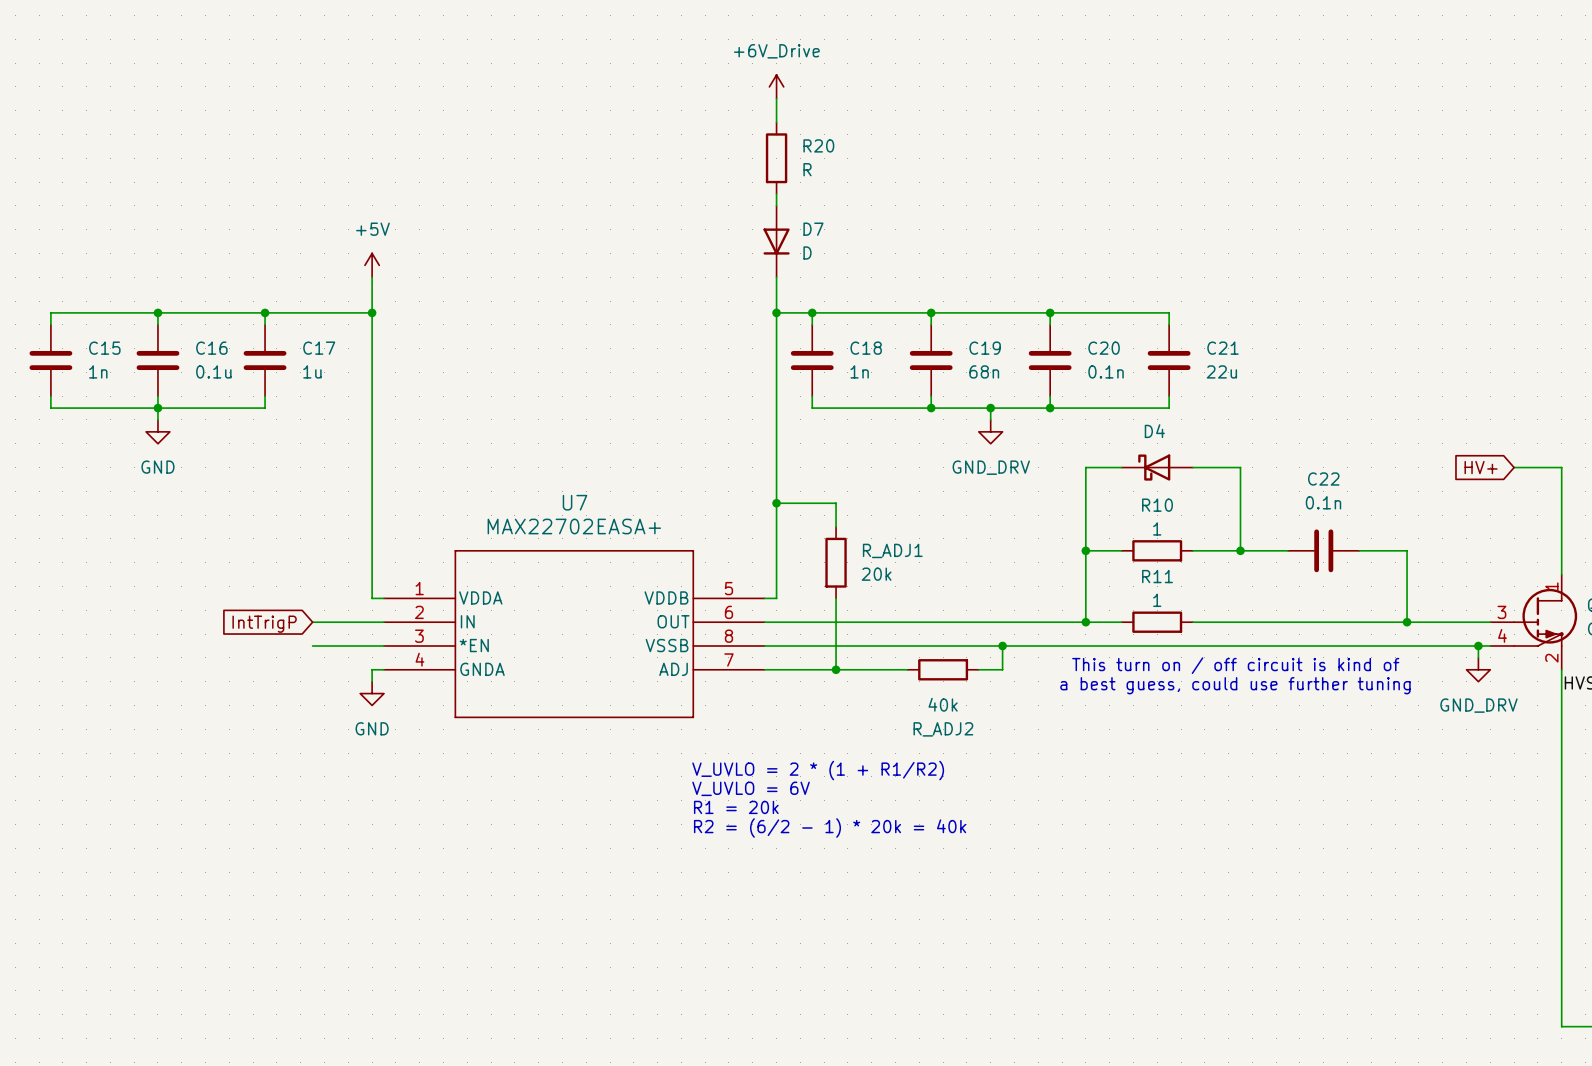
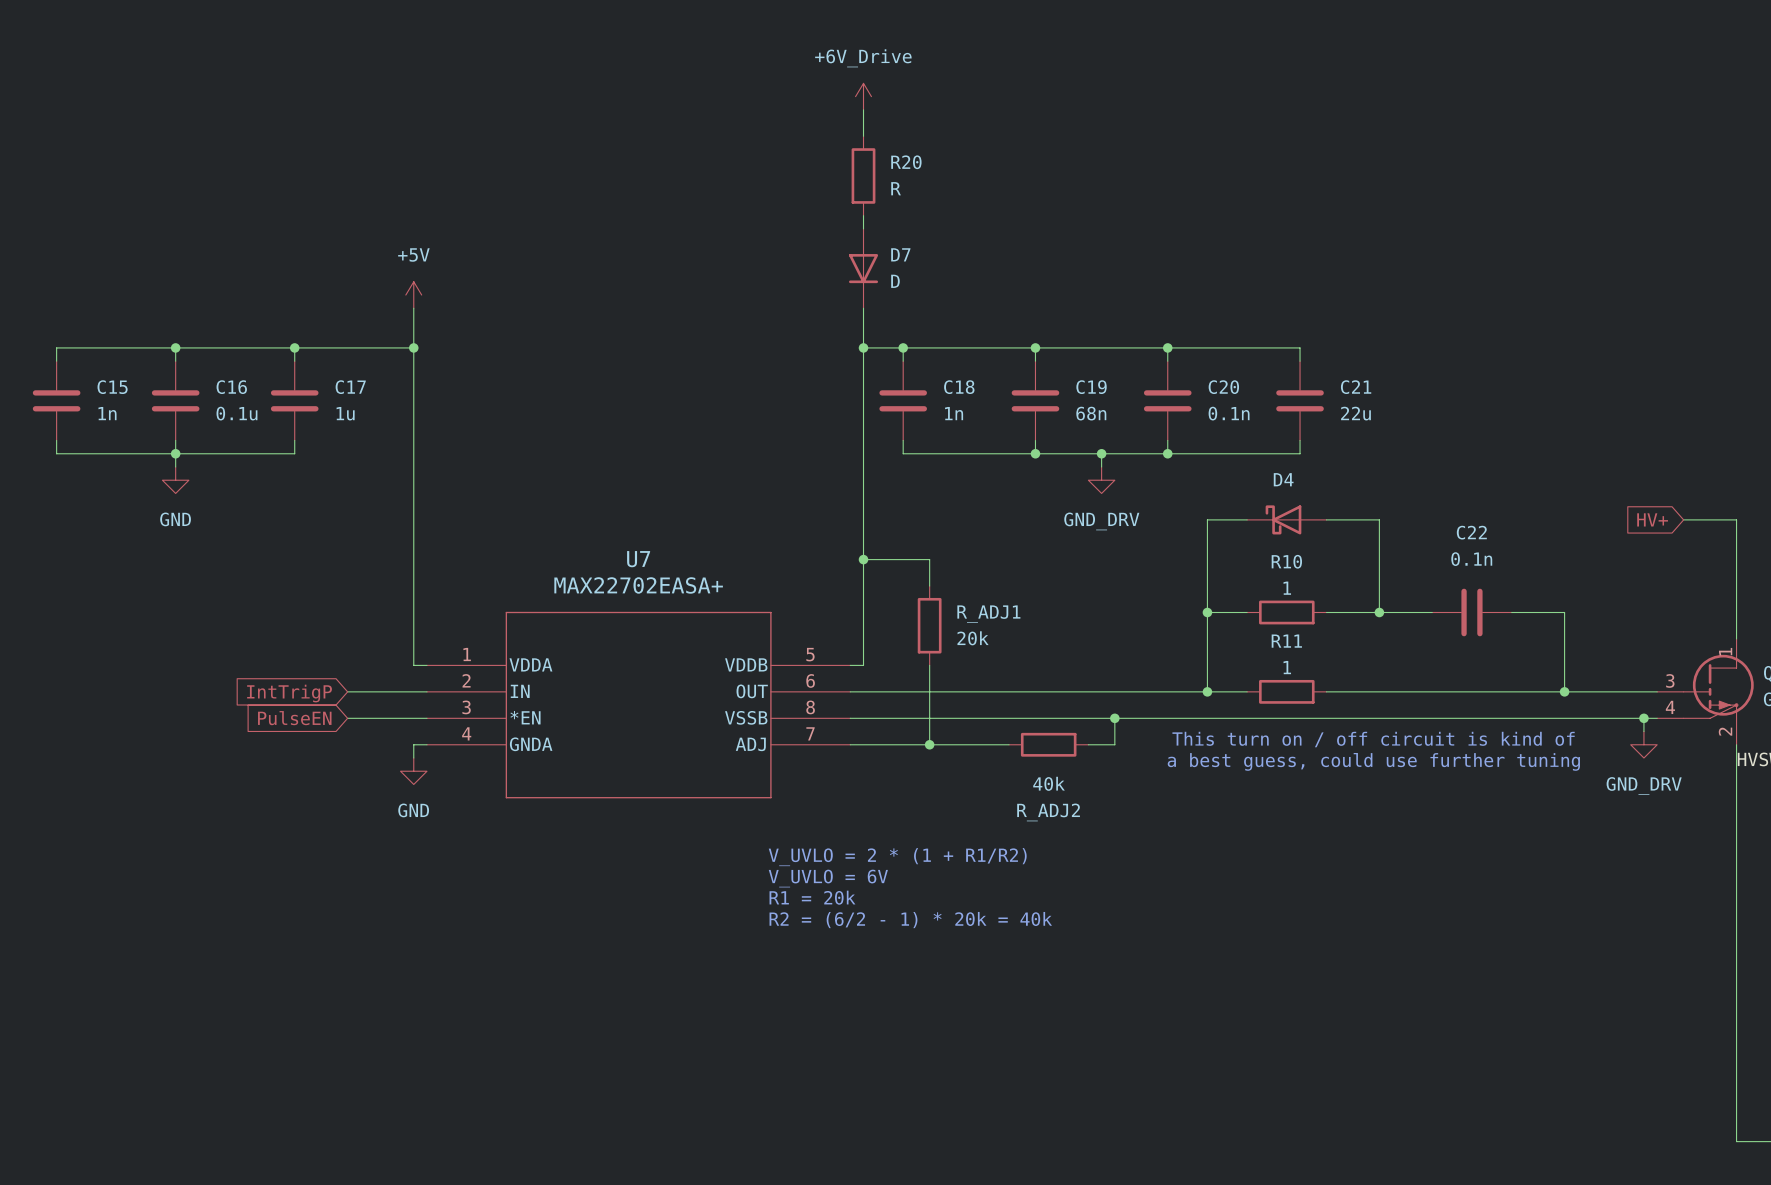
global label: none -> PulseEN (294, 718)

